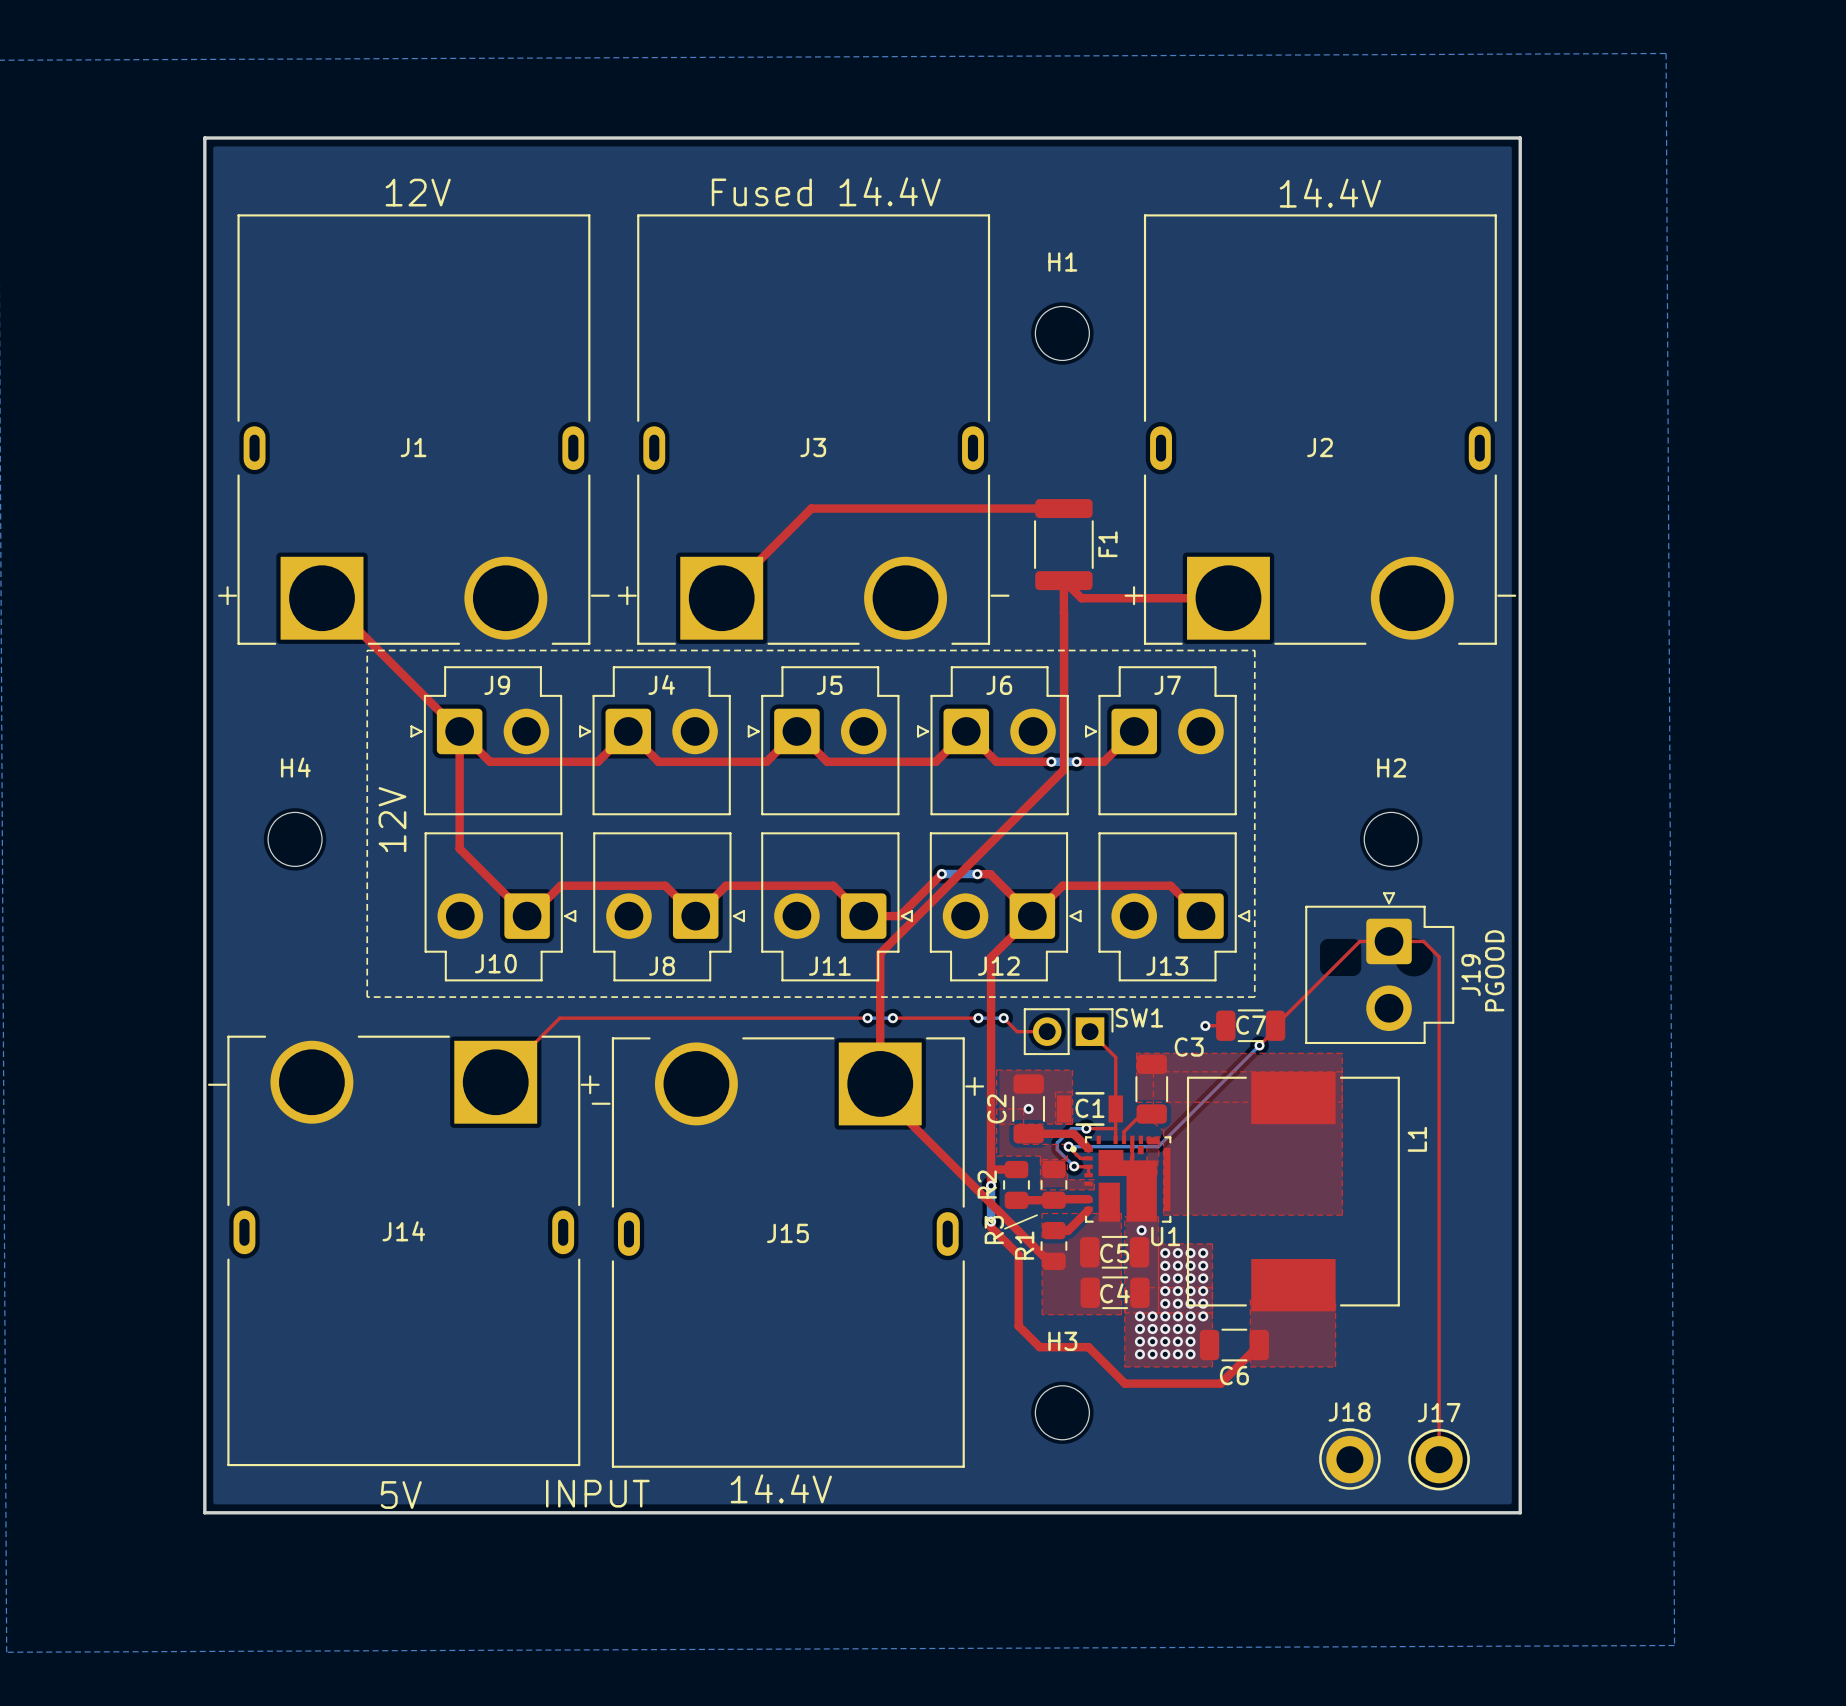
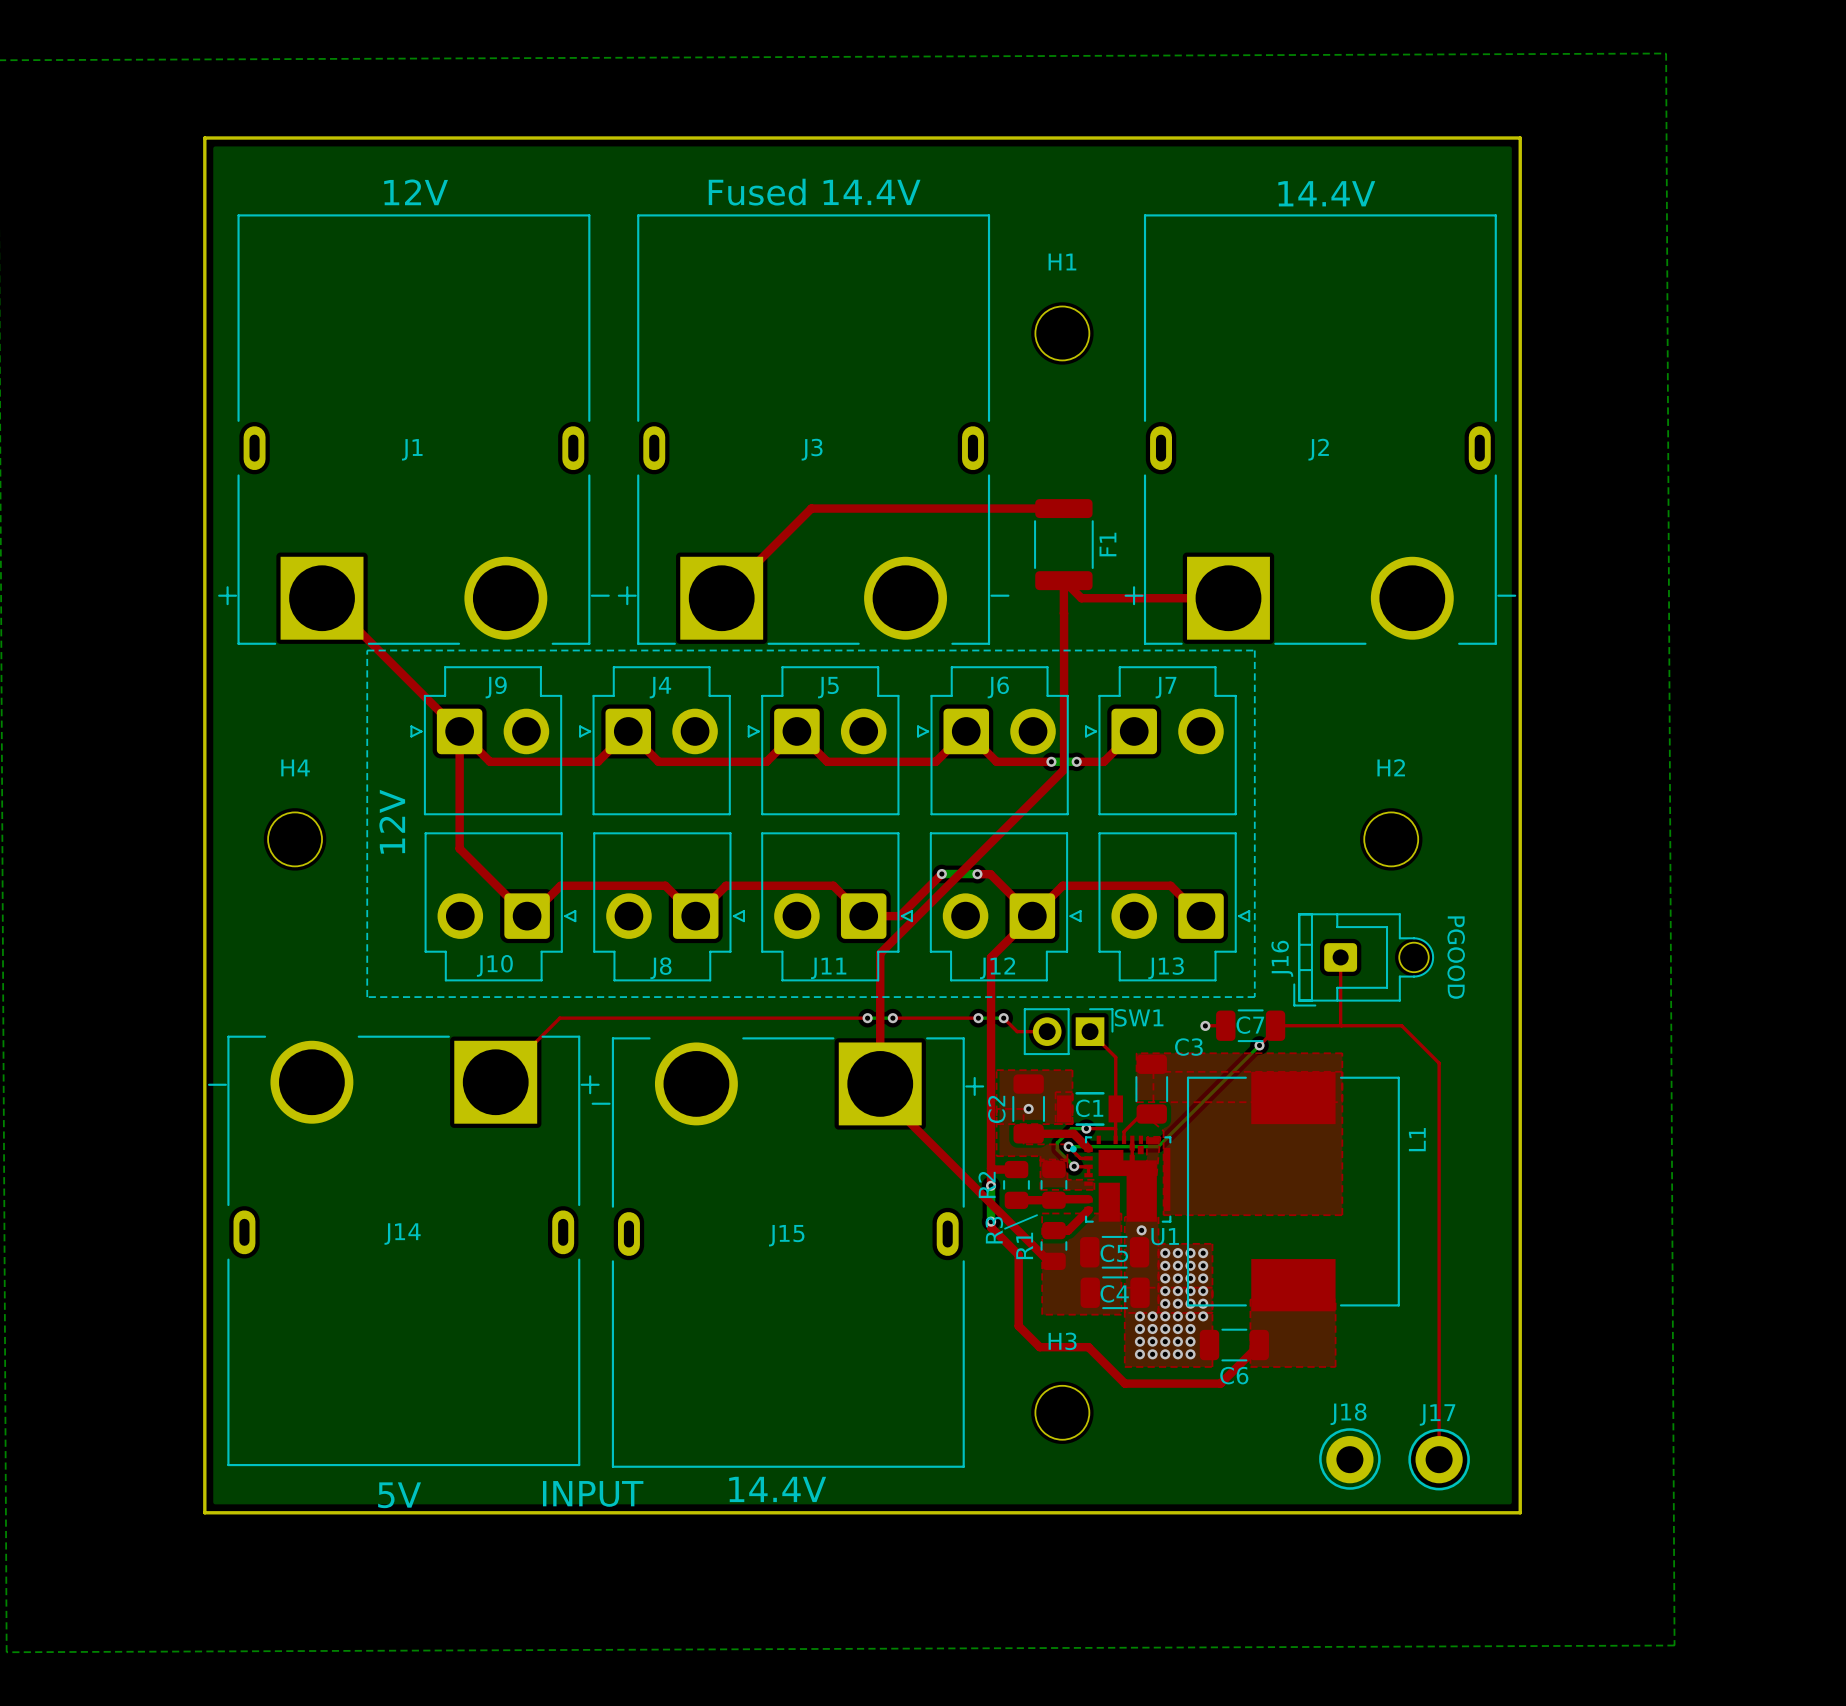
top track: none -> (1340, 957) (1341, 1025)
J16: none -> (1363, 959)
J19: (1379, 968) -> none
text rotation: 0° (1494, 970) -> 180° (1456, 957)
top track: (1275, 1025) (1359, 941) (1423, 941) (1439, 956) (1439, 1063) -> (1275, 1025) (1401, 1025) (1439, 1063)

